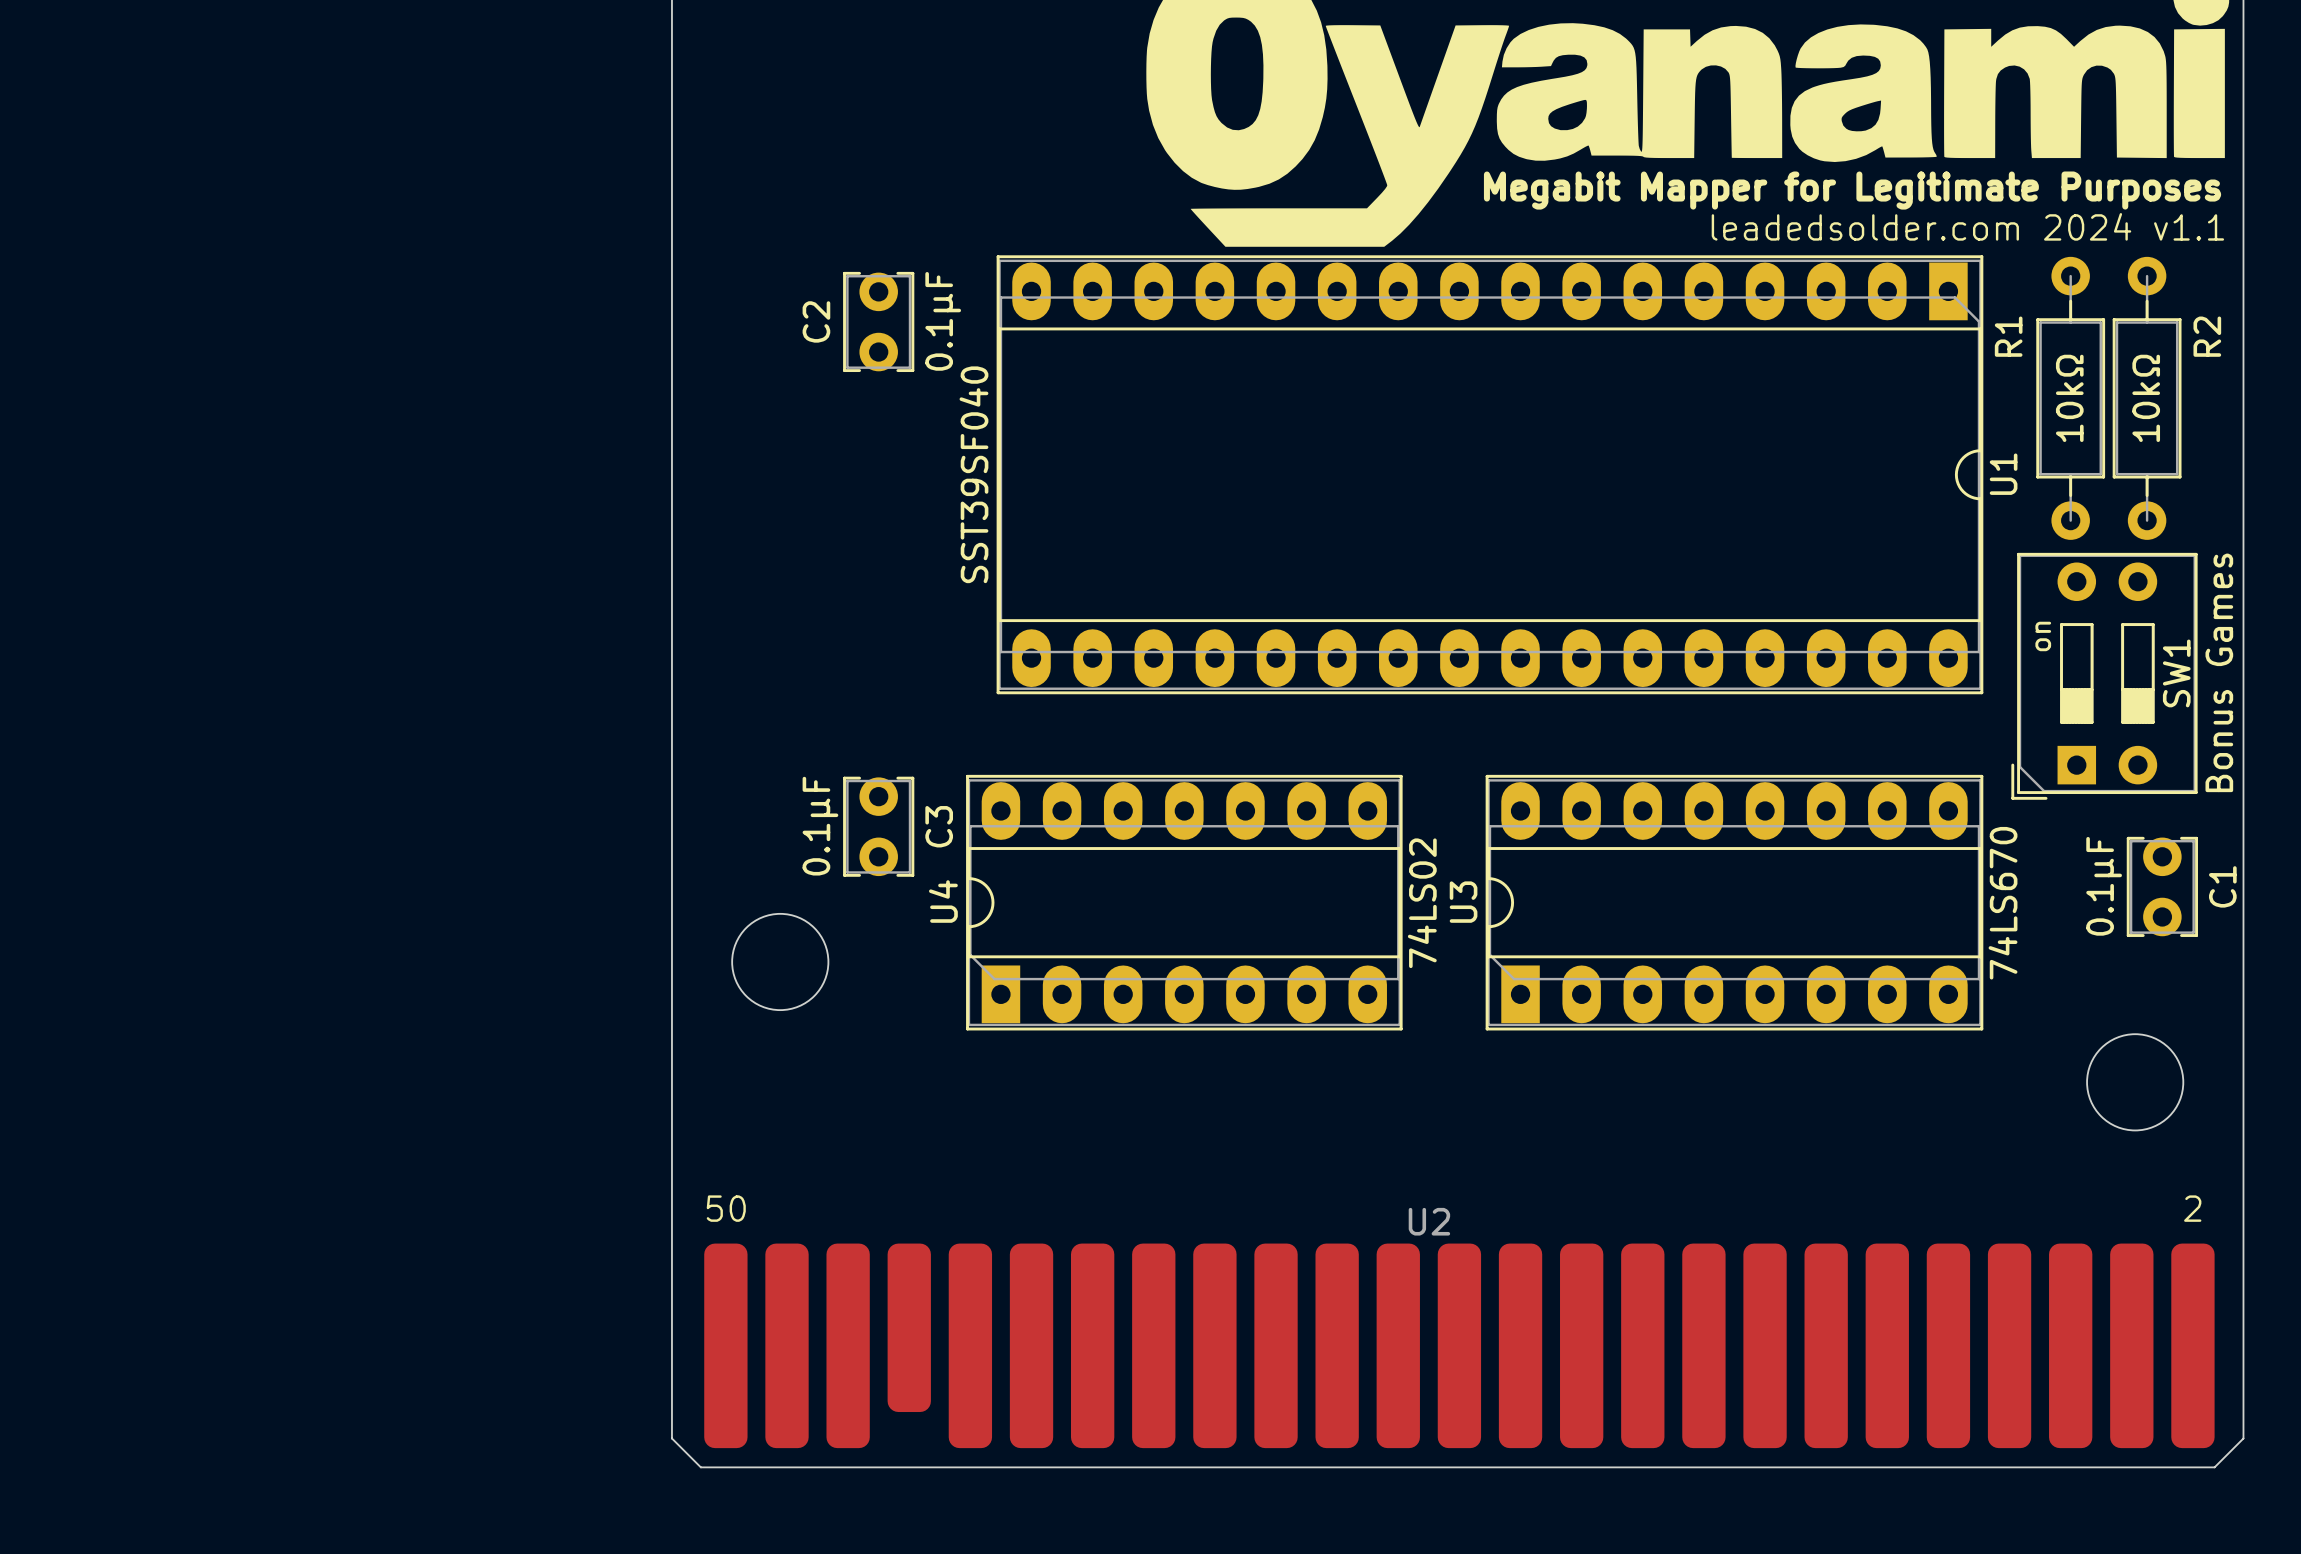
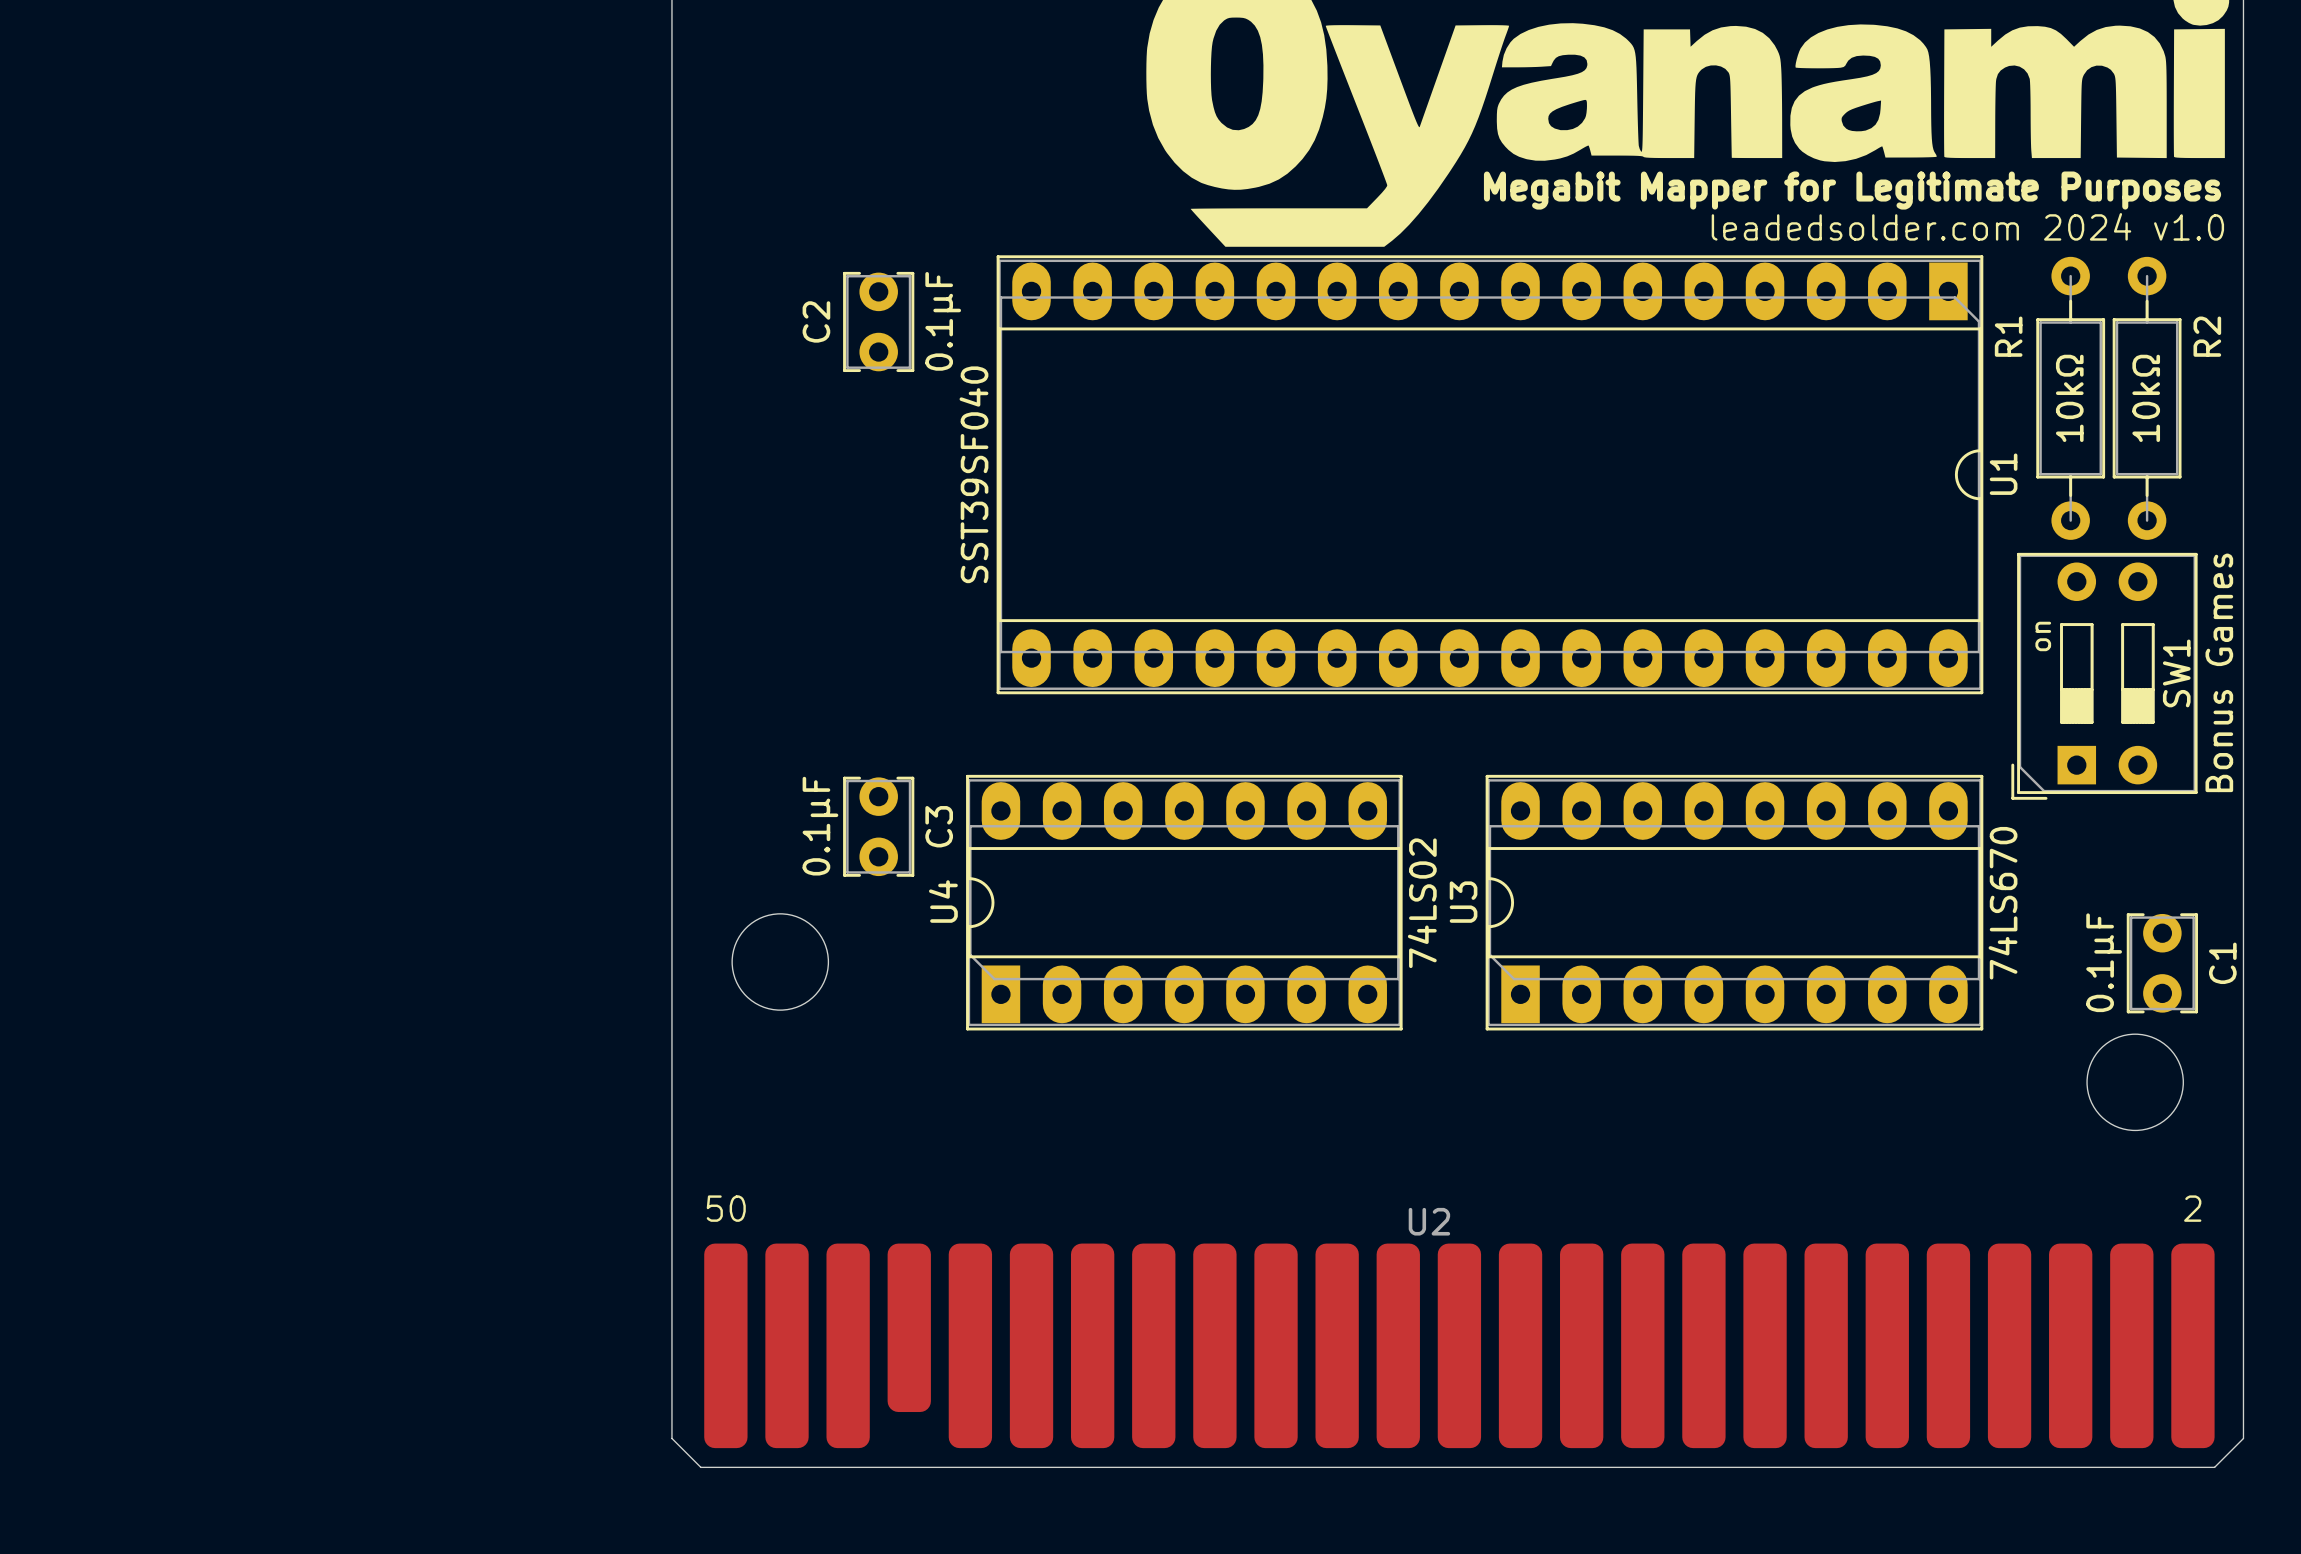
text: leadedsolder.com 2024 v1.1 (1967, 226) -> leadedsolder.com 2024 v1.0 (1967, 226)
C1 position: (2162, 886) -> (2162, 963)

